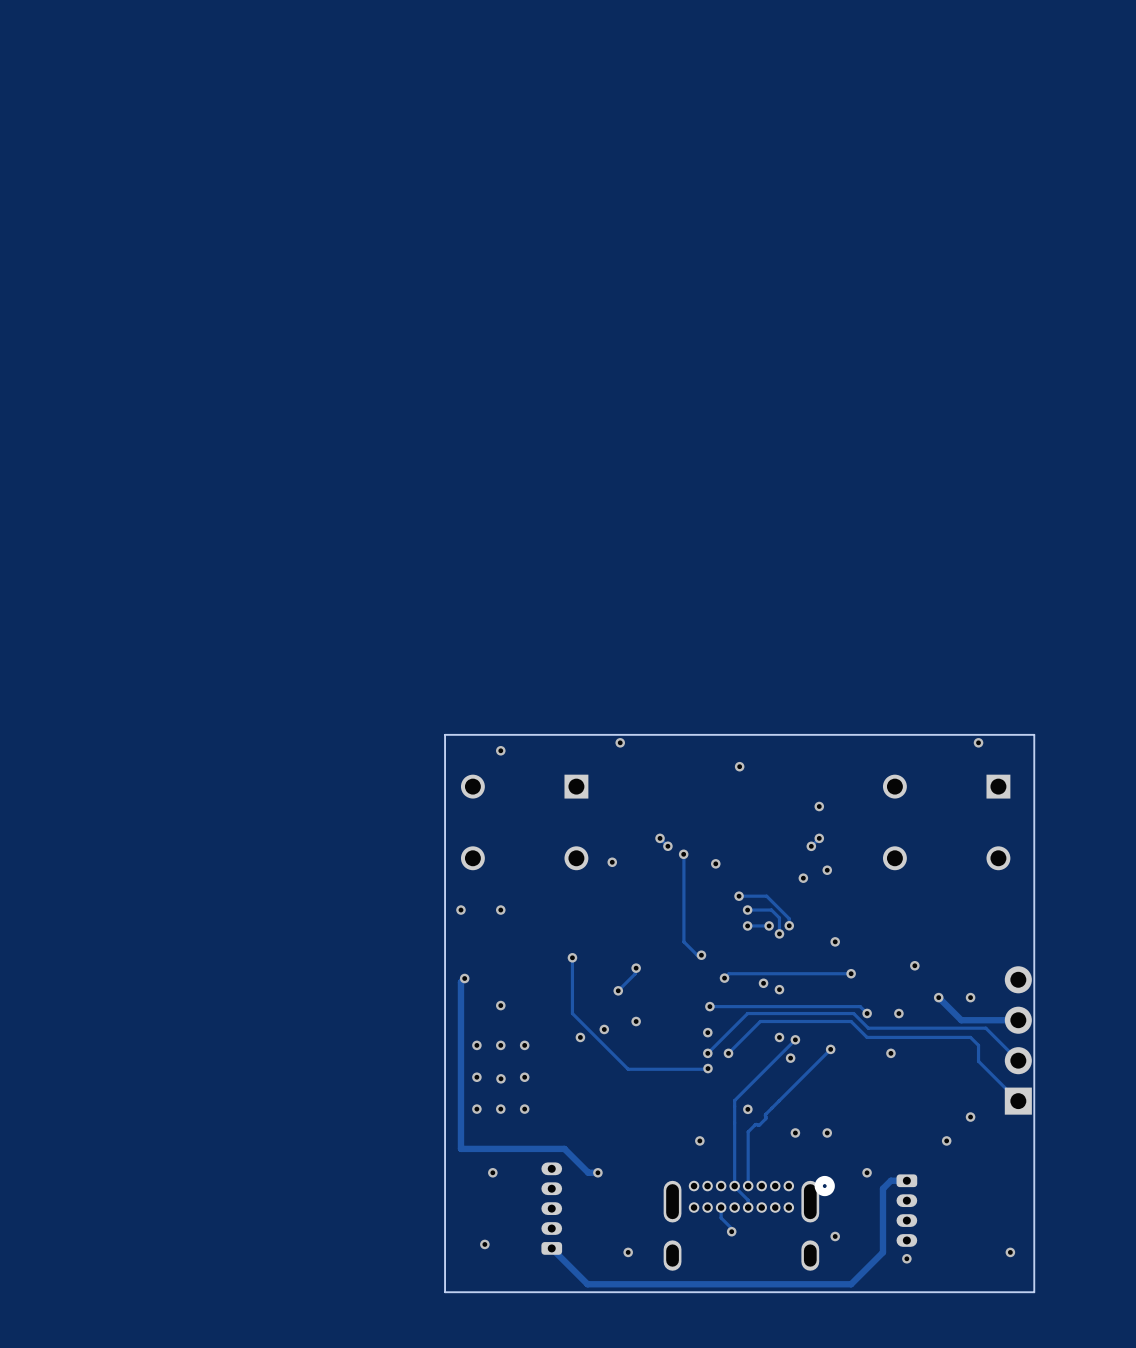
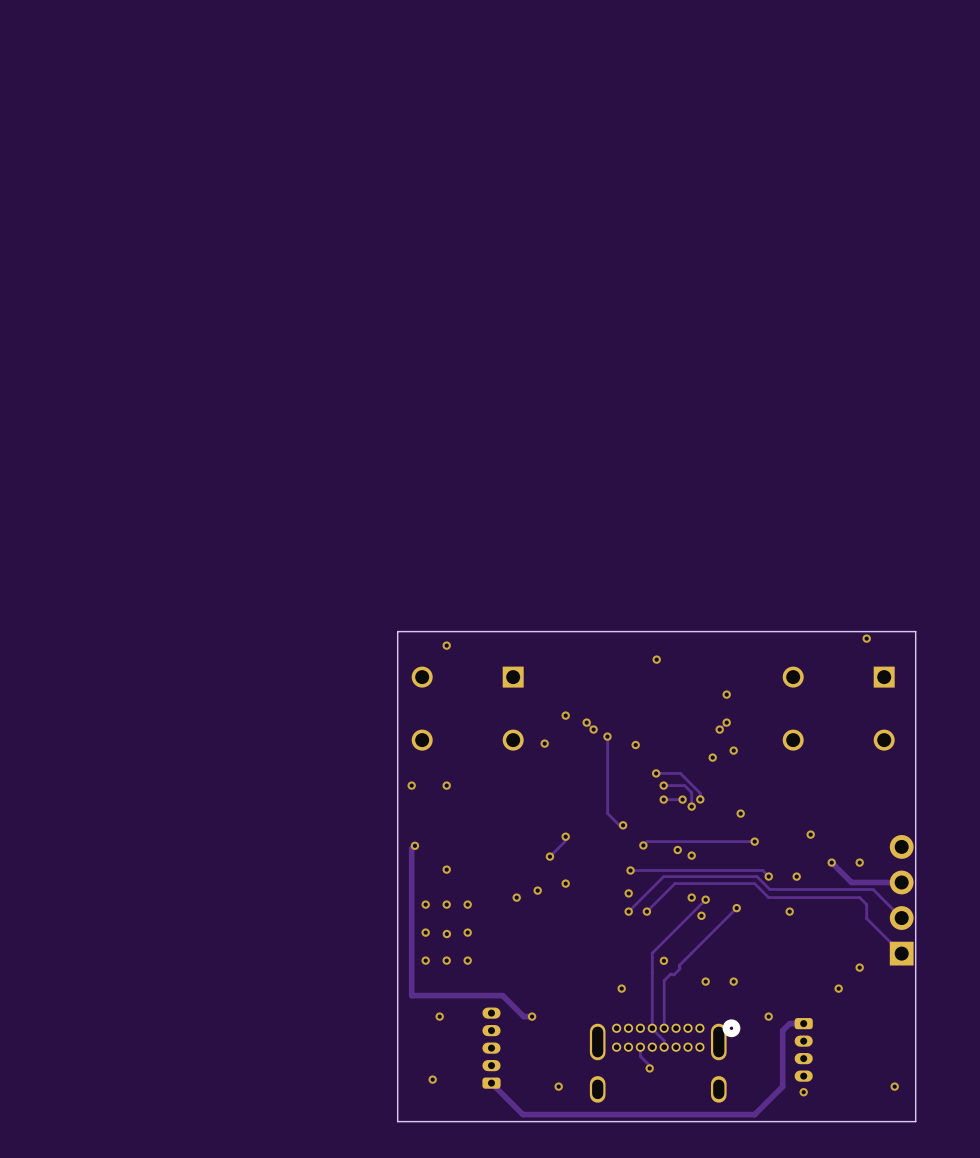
via: (620, 742) -> none
via: none -> (565, 715)
track: (572, 957) (572, 1013) (628, 1069) (708, 1068) -> none
via: (572, 957) -> none
via: (708, 1068) -> none
via: (835, 1236) -> none

